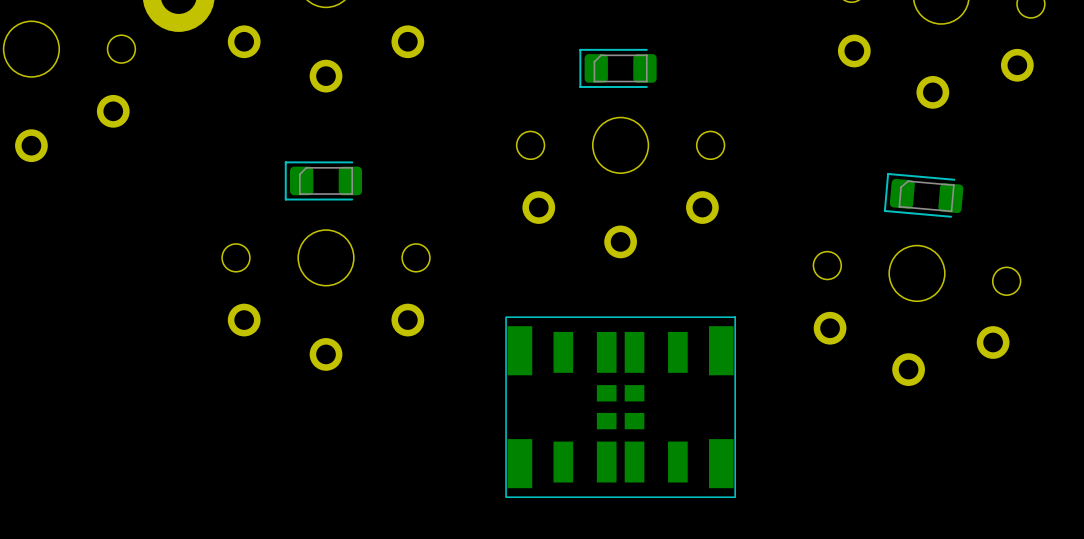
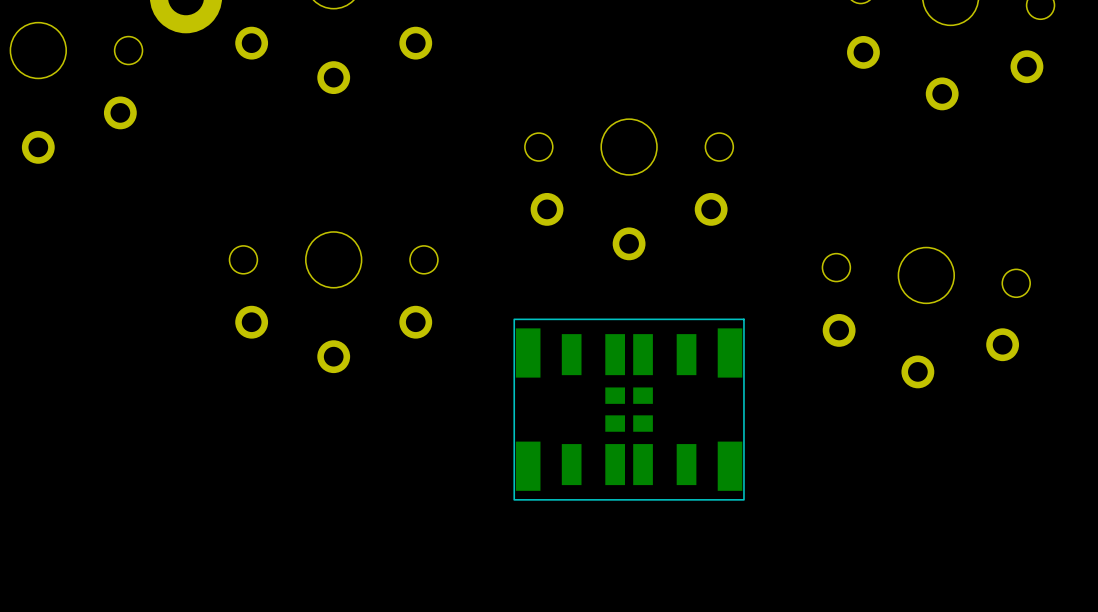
part: (617, 68) -> none
part: (323, 180) -> none
part: (923, 195) -> none

